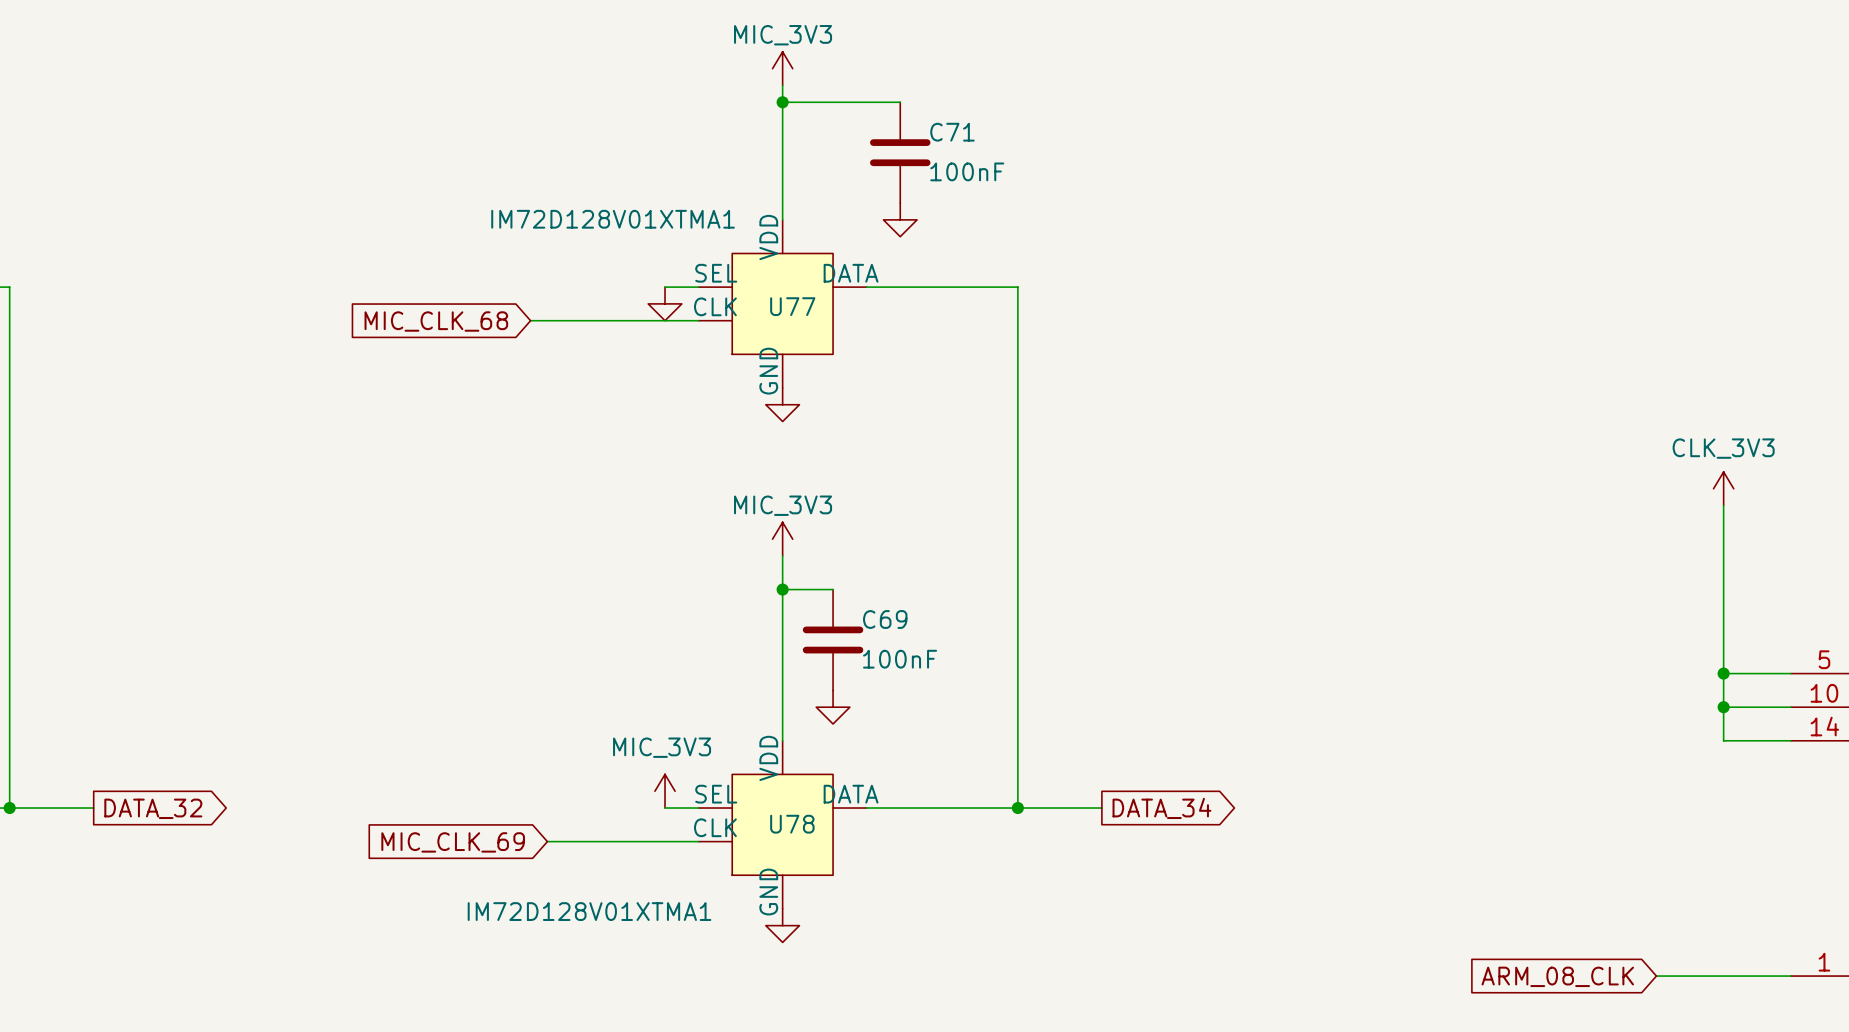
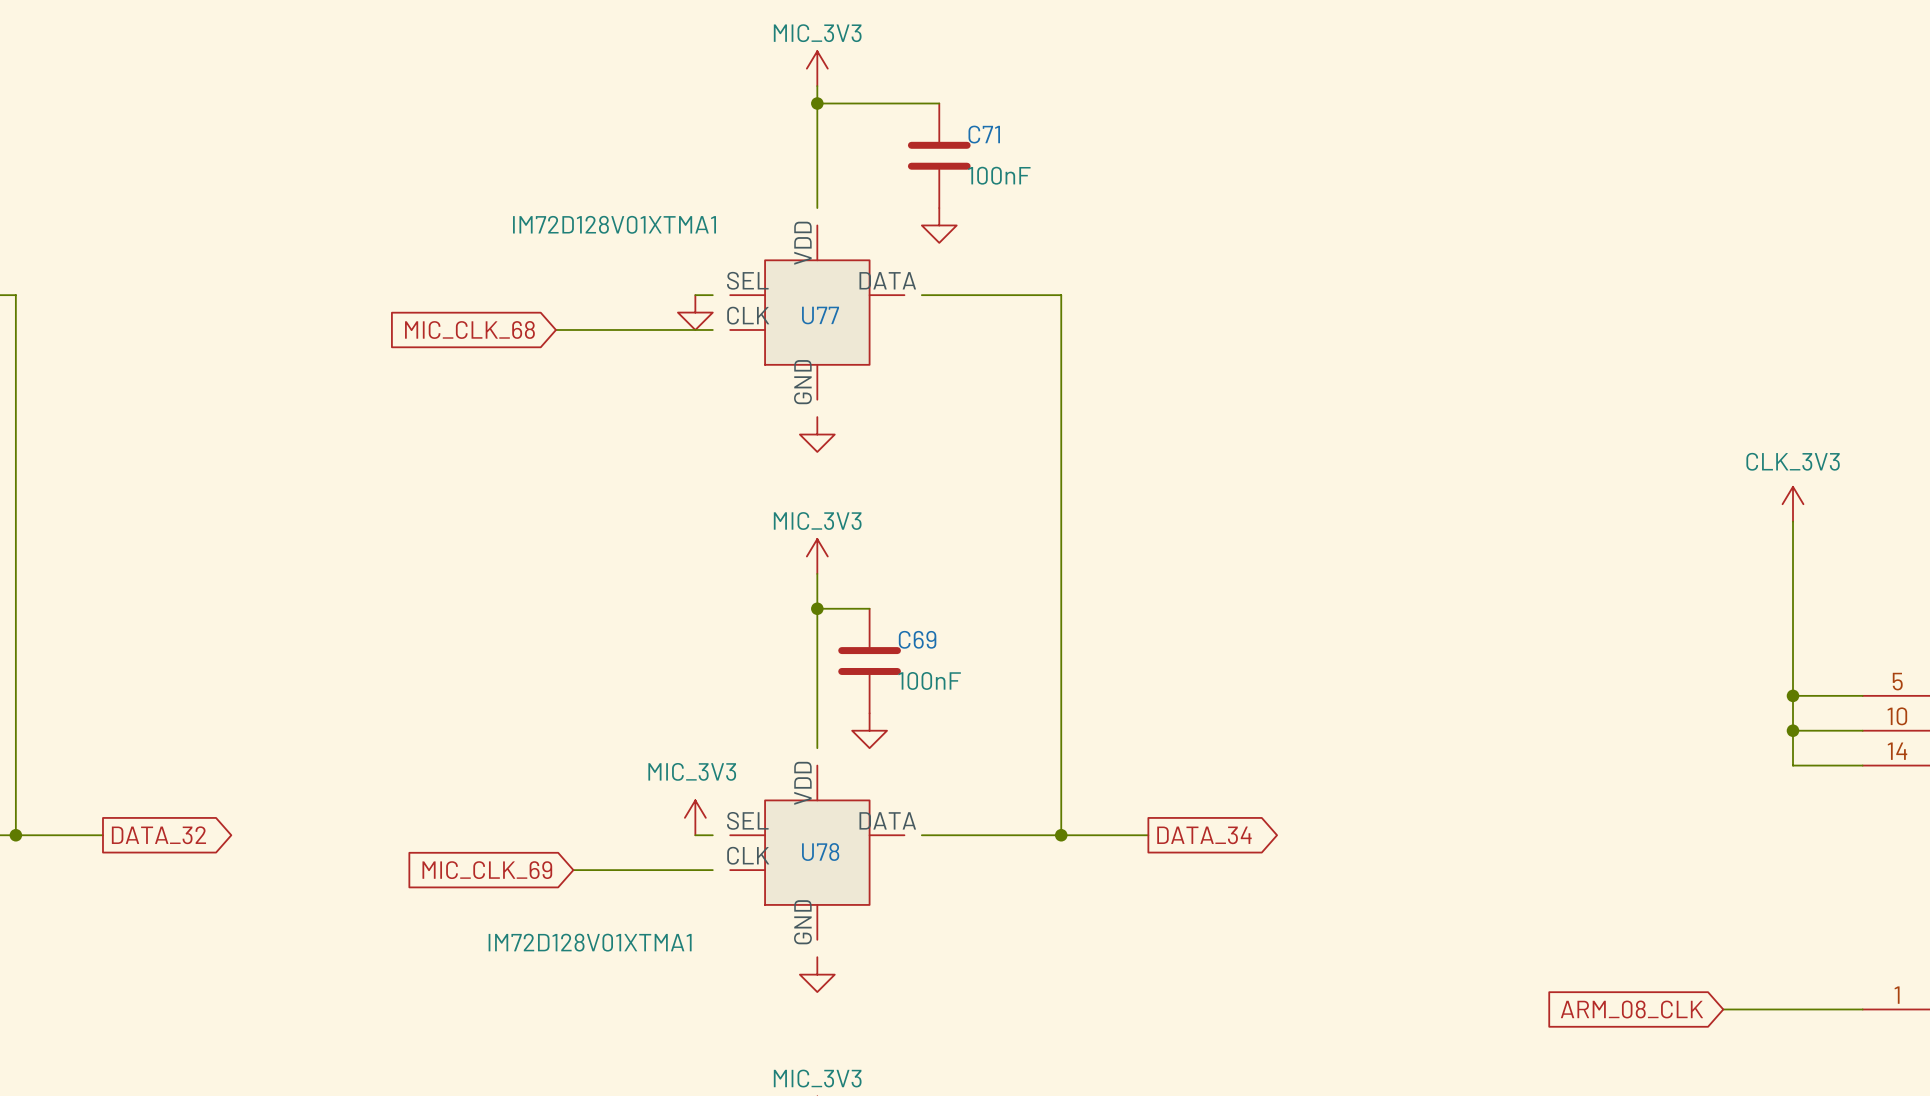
wire: (782, 203) (782, 219) -> none
wire: (681, 287) (698, 287) -> none
wire: (866, 287) (883, 287) -> none
wire: (681, 320) (698, 320) -> none
power symbol position: (782, 404) -> (817, 434)
wire: (782, 723) (782, 740) -> none
wire: (681, 808) (698, 808) -> none
wire: (866, 808) (883, 808) -> none
wire: (681, 841) (698, 841) -> none
power symbol position: (782, 925) -> (817, 974)

